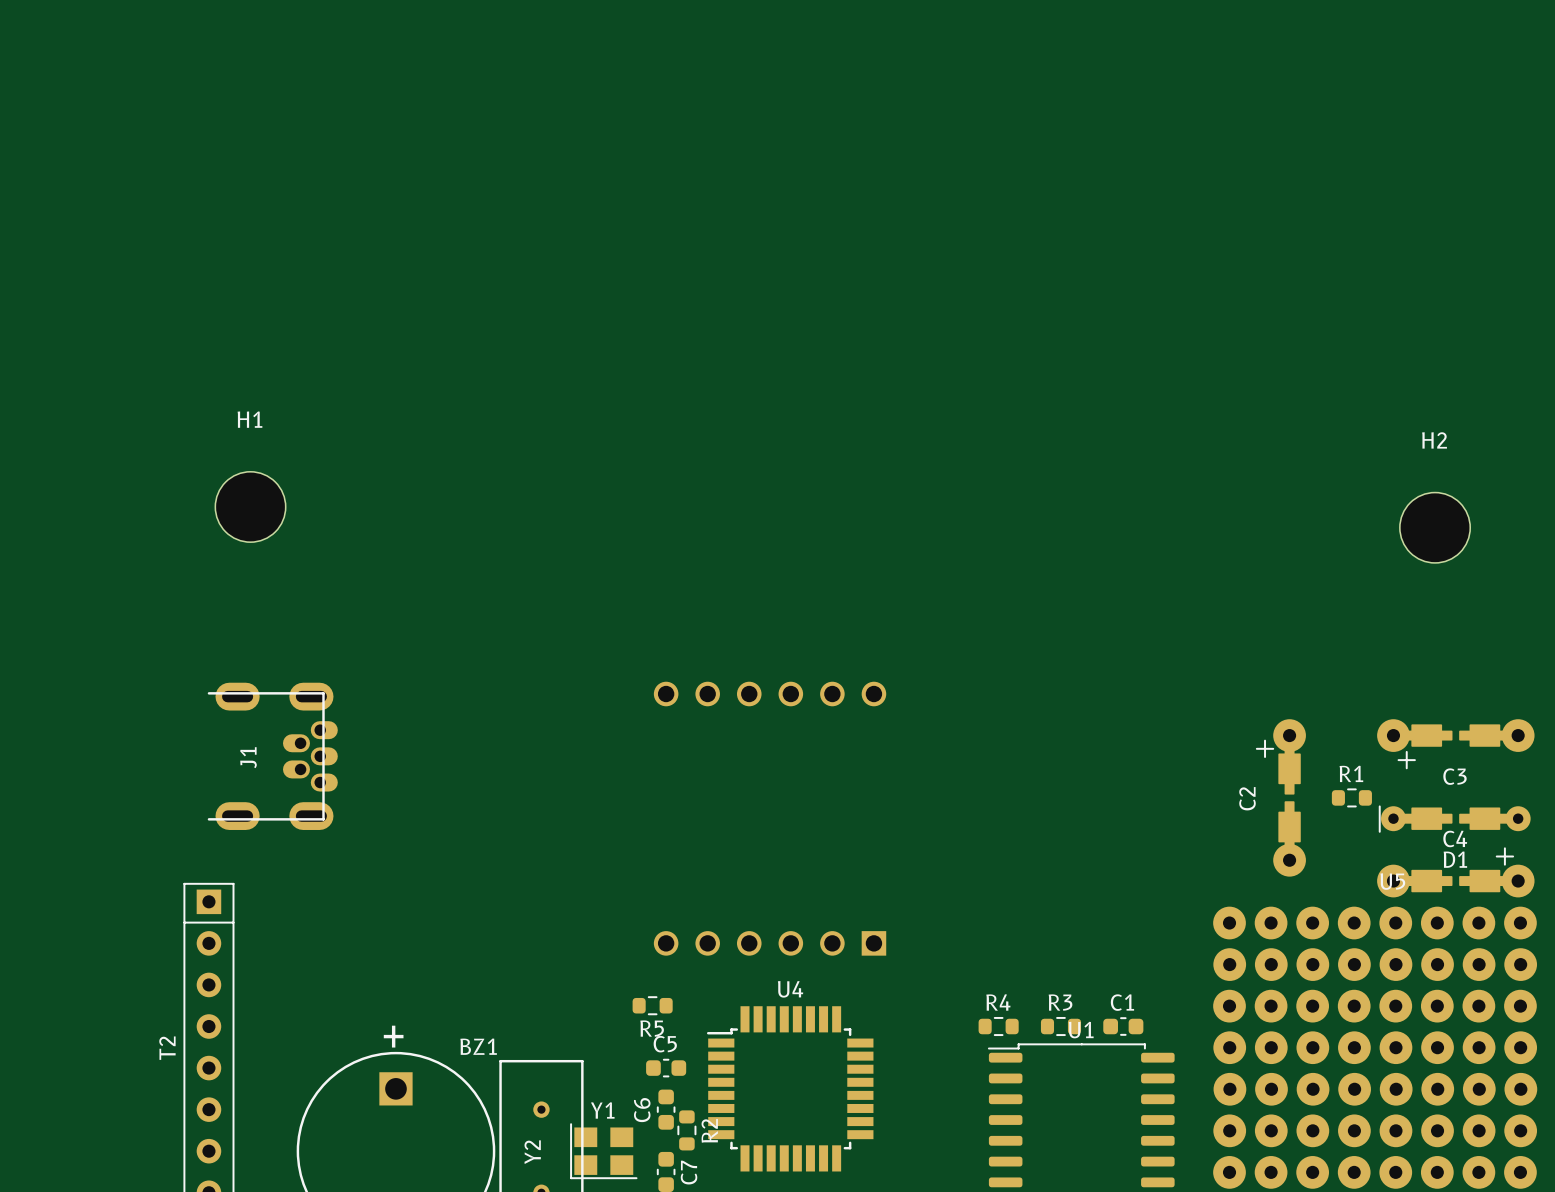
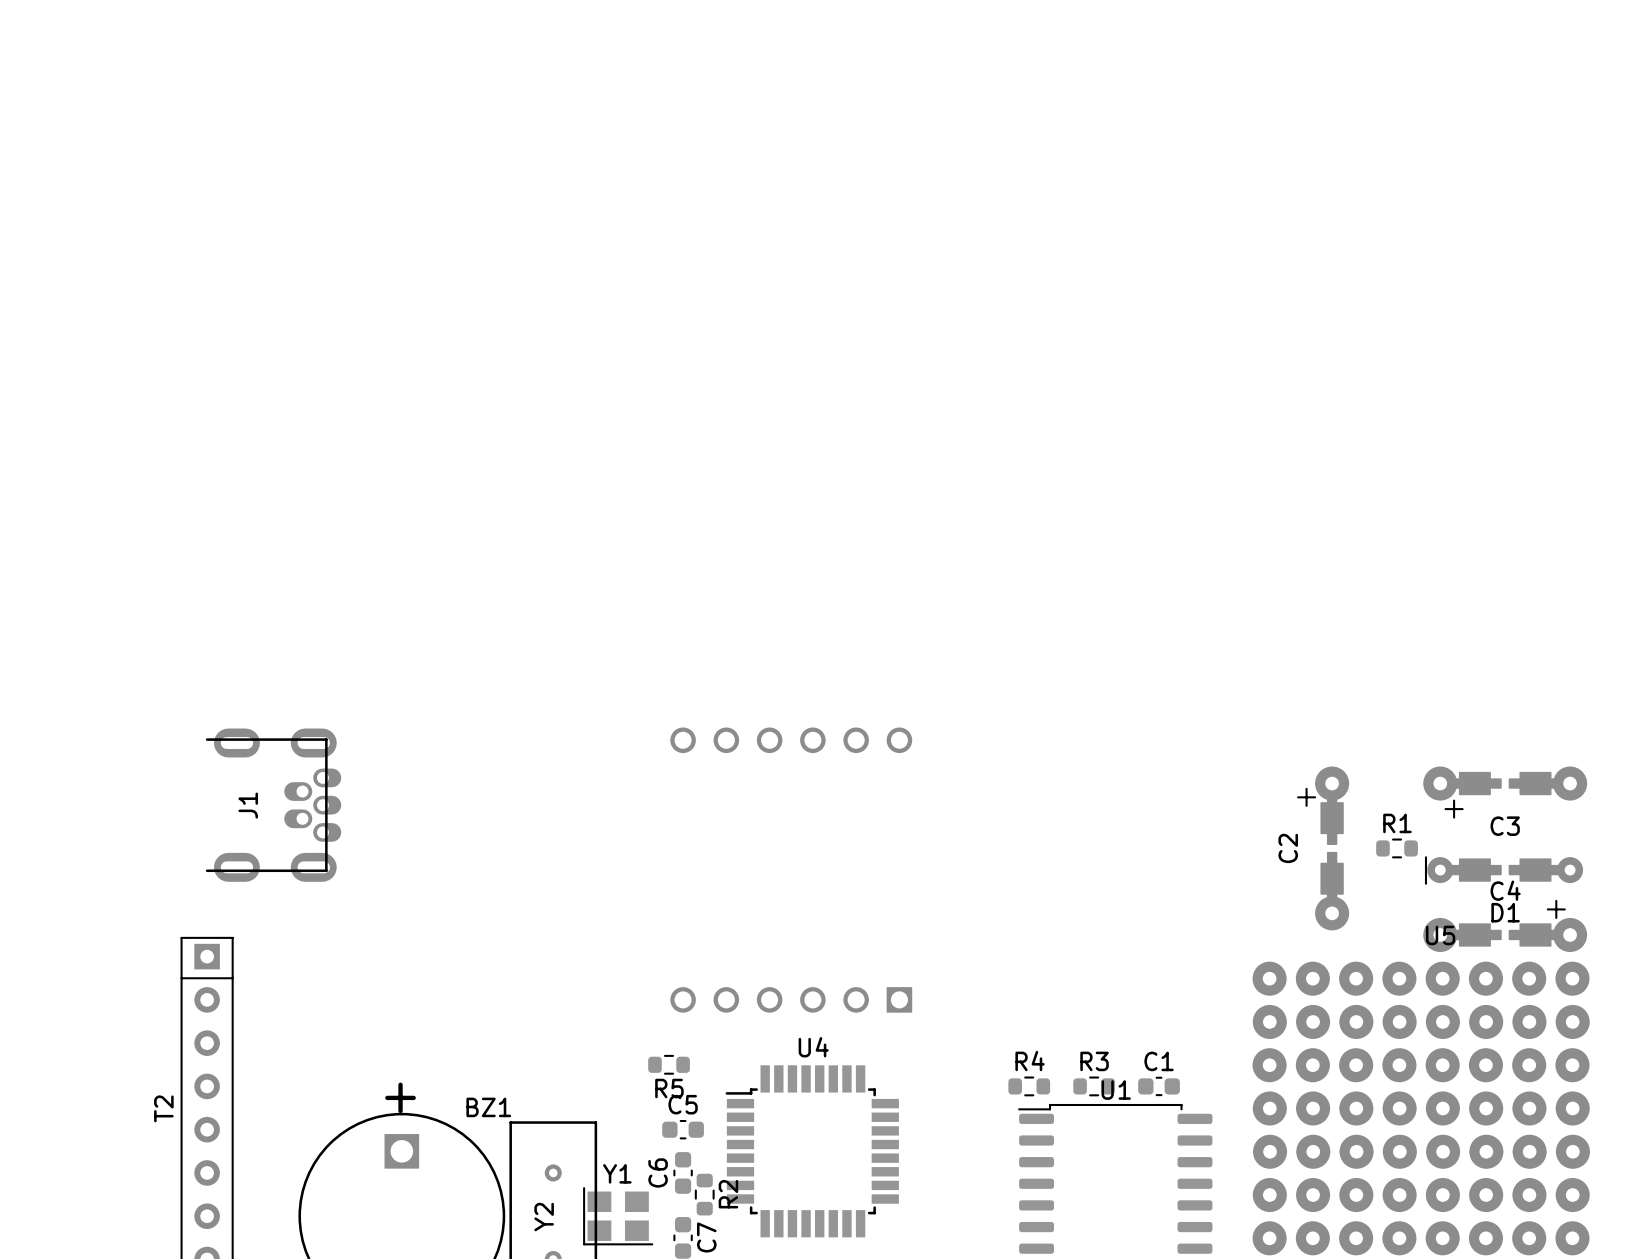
H1: (250, 506) -> none
H2: (1435, 527) -> none

